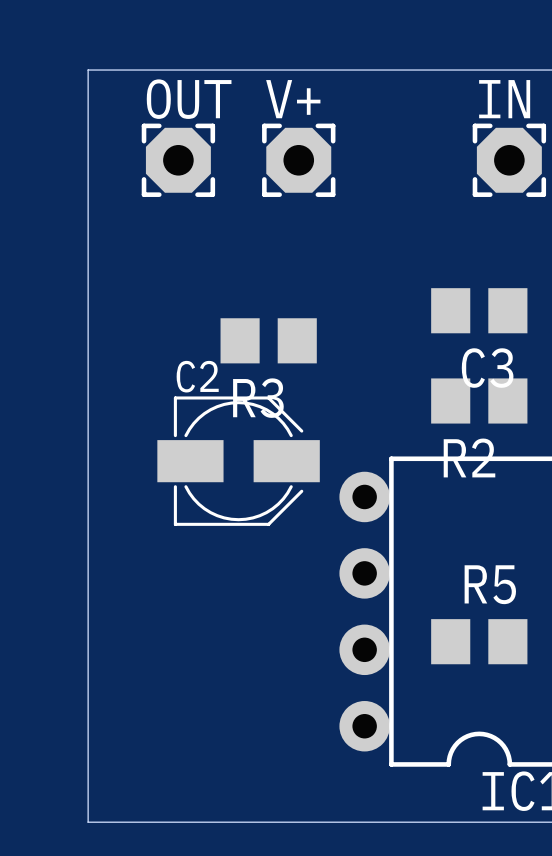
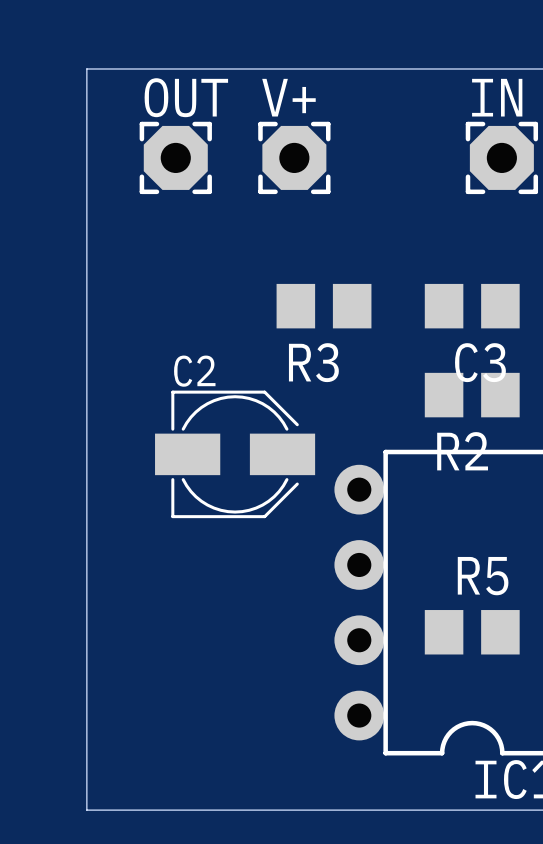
R3 position: (268, 340) -> (324, 306)

